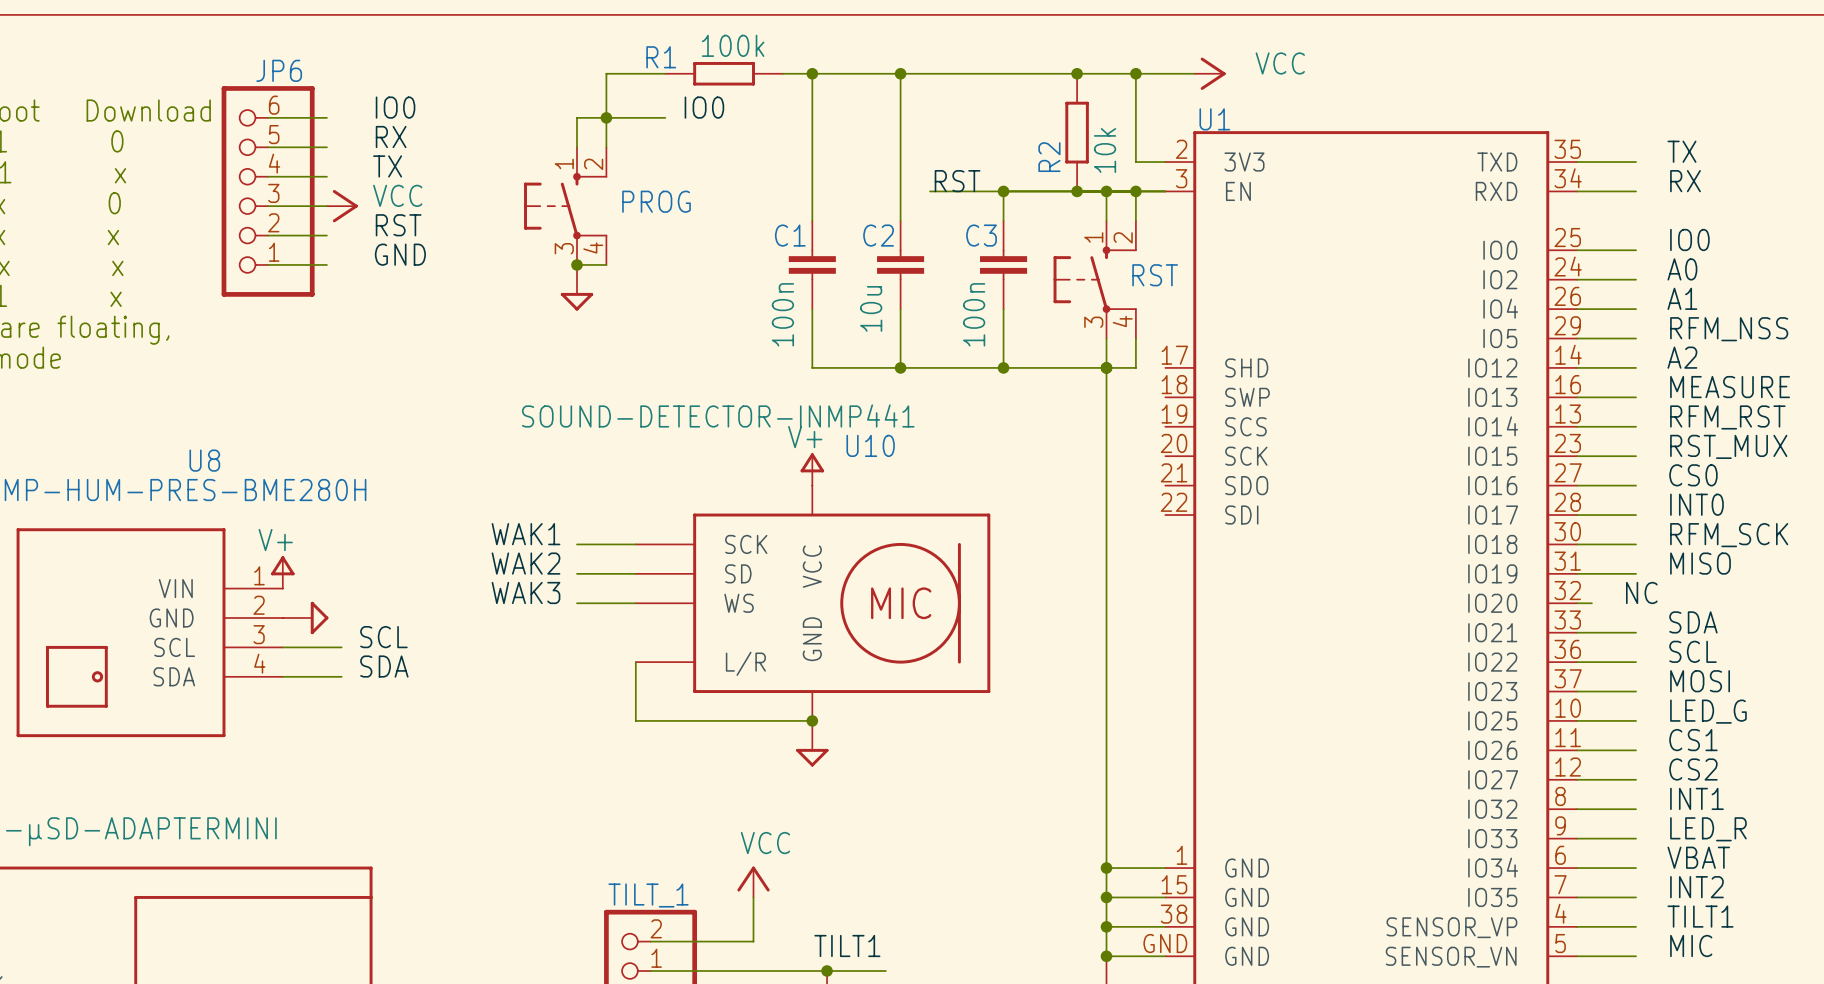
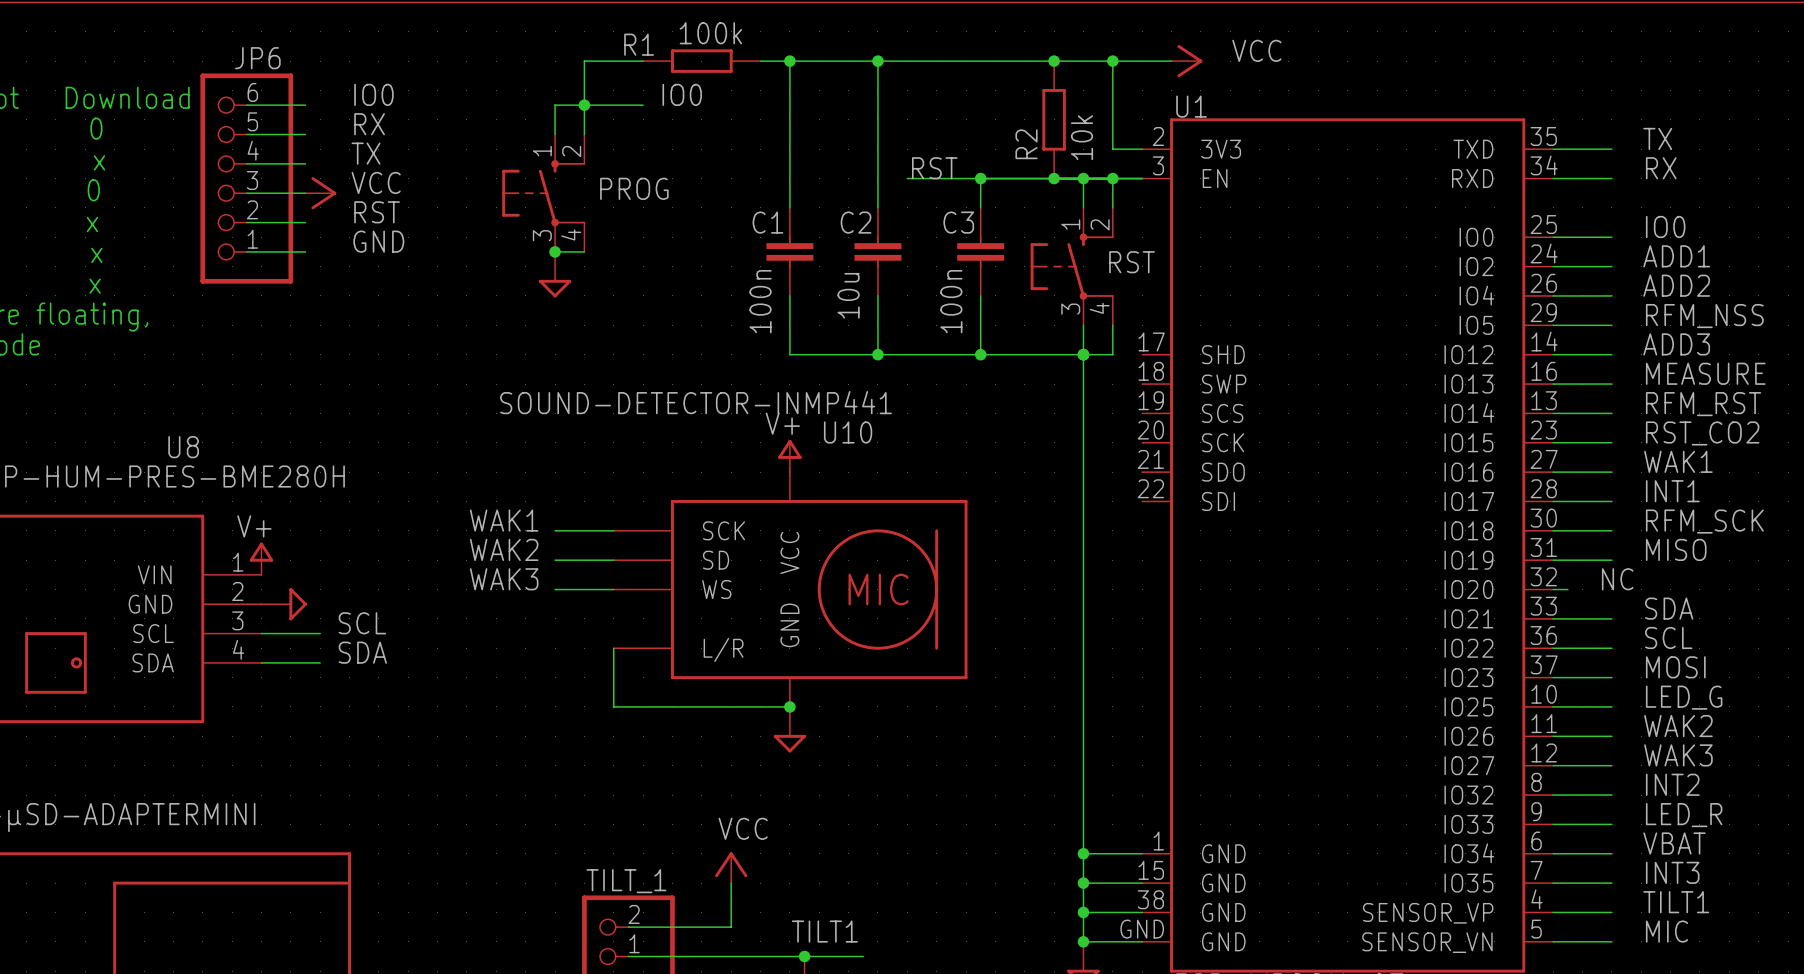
label: A0 (1682, 269) -> ADD1 (1676, 256)
label: A1 (1682, 298) -> ADD2 (1676, 285)
label: A2 (1682, 357) -> ADD3 (1676, 344)
label: RST_MUX (1728, 446) -> RST_CO2 (1702, 433)
label: CS0 (1693, 475) -> WAK1 (1678, 461)
label: INT0 (1696, 504) -> INT1 (1672, 491)
label: CS1 (1693, 740) -> WAK2 (1678, 726)
label: CS2 (1693, 769) -> WAK3 (1678, 755)
label: INT1 (1696, 798) -> INT2 (1672, 784)
label: INT2 (1696, 887) -> INT3 (1672, 872)

